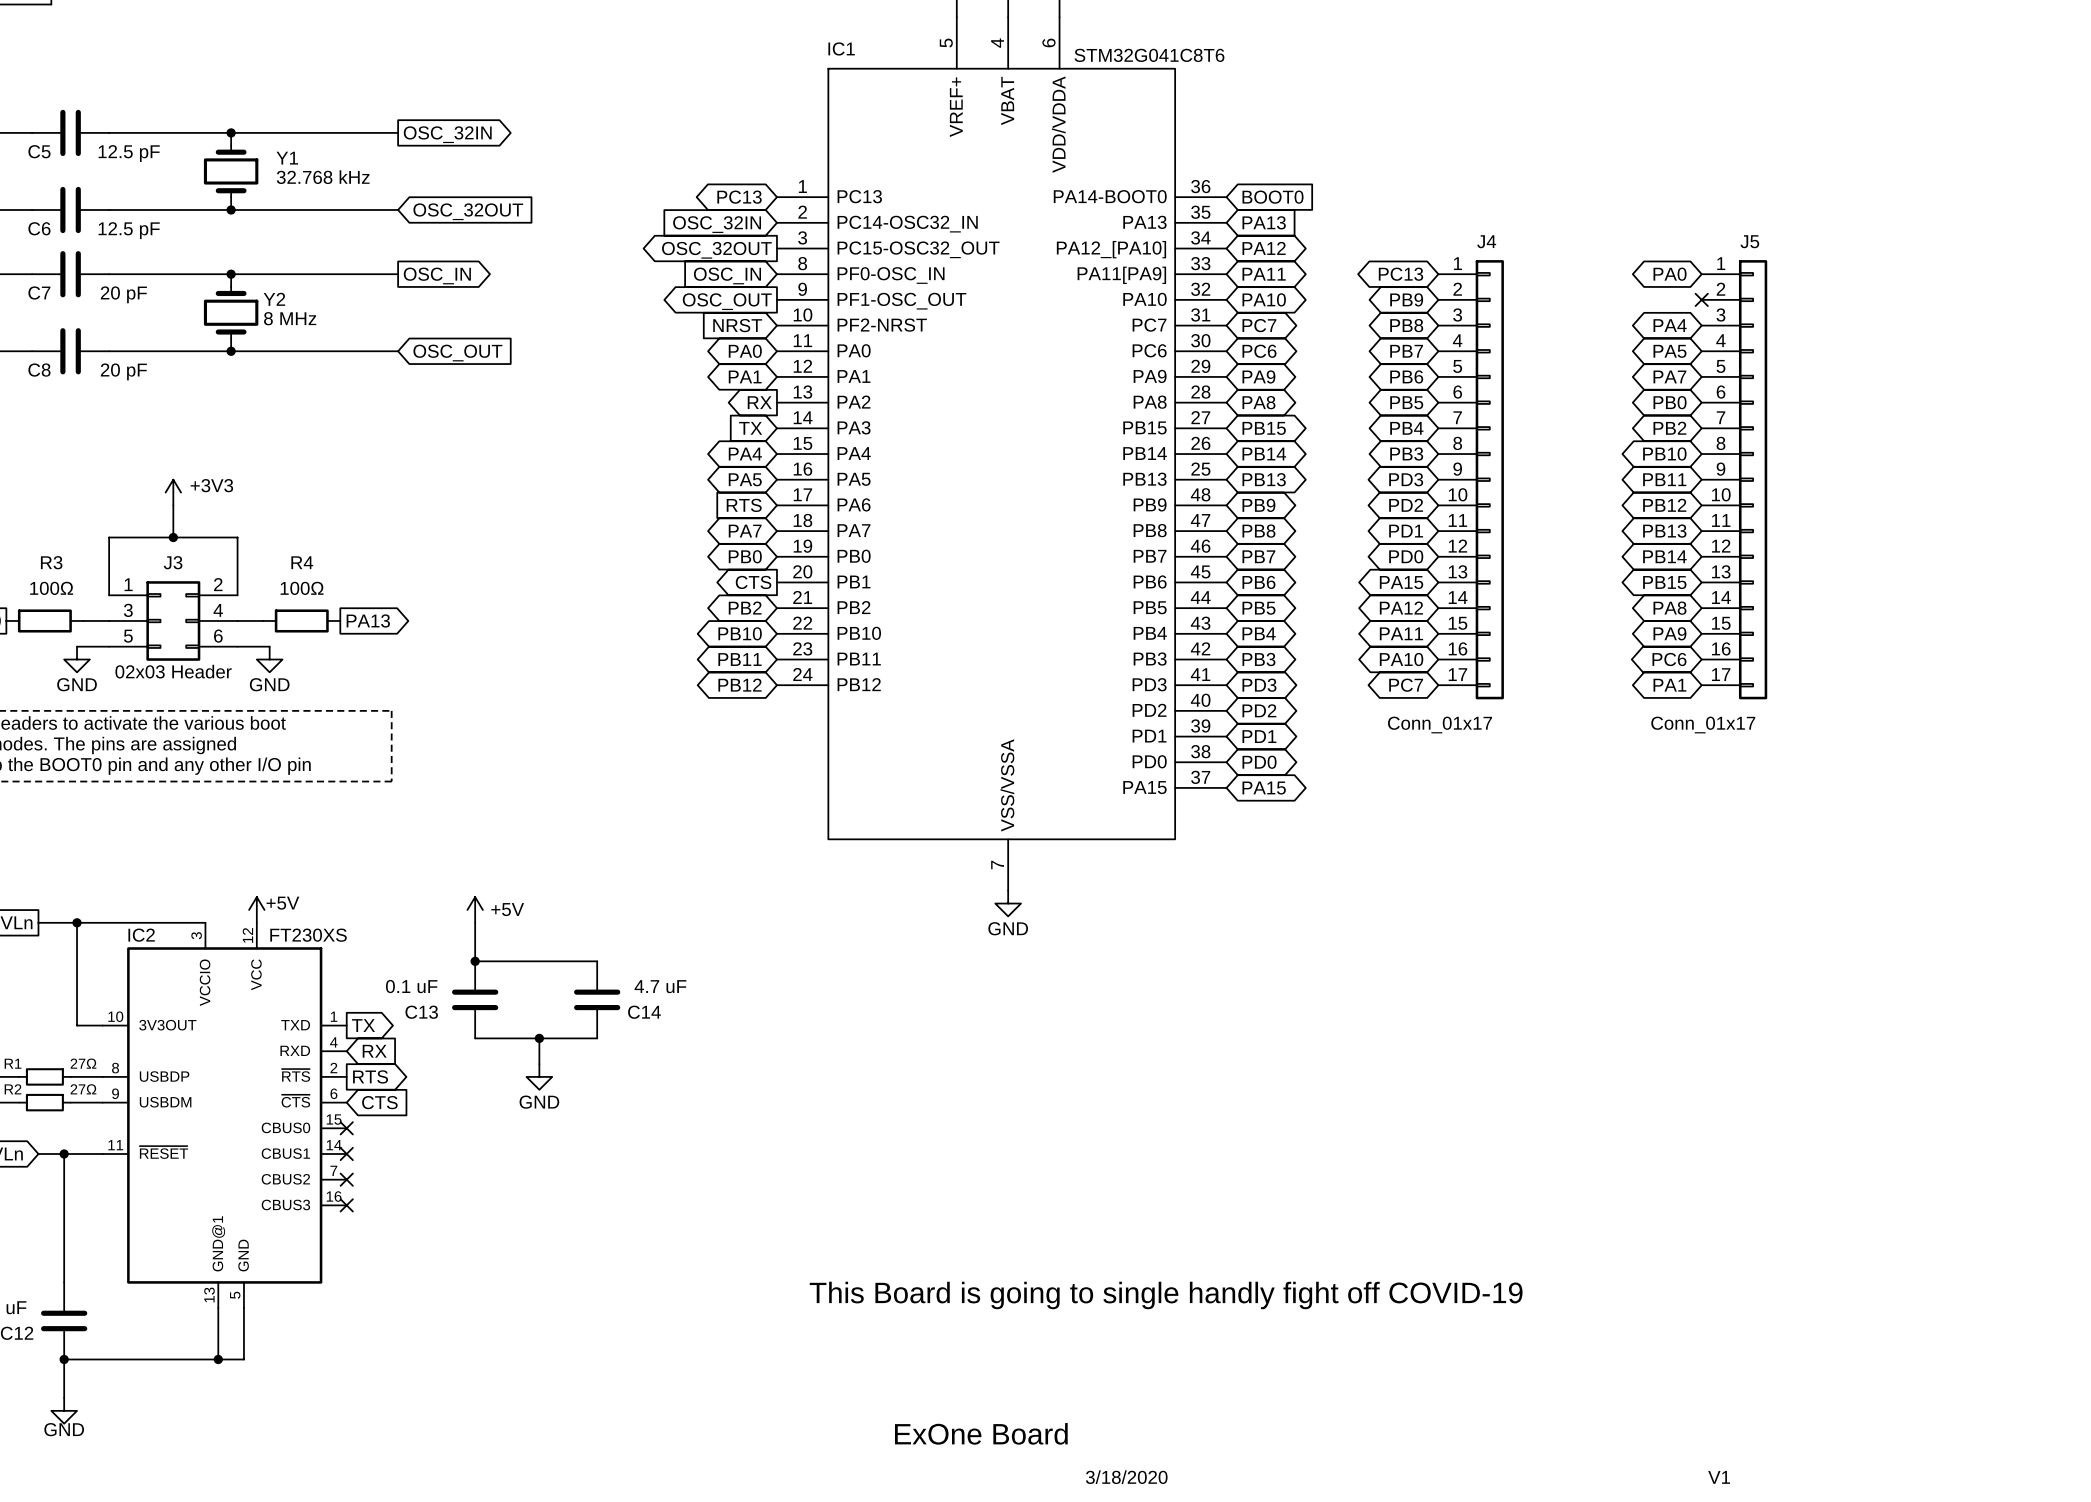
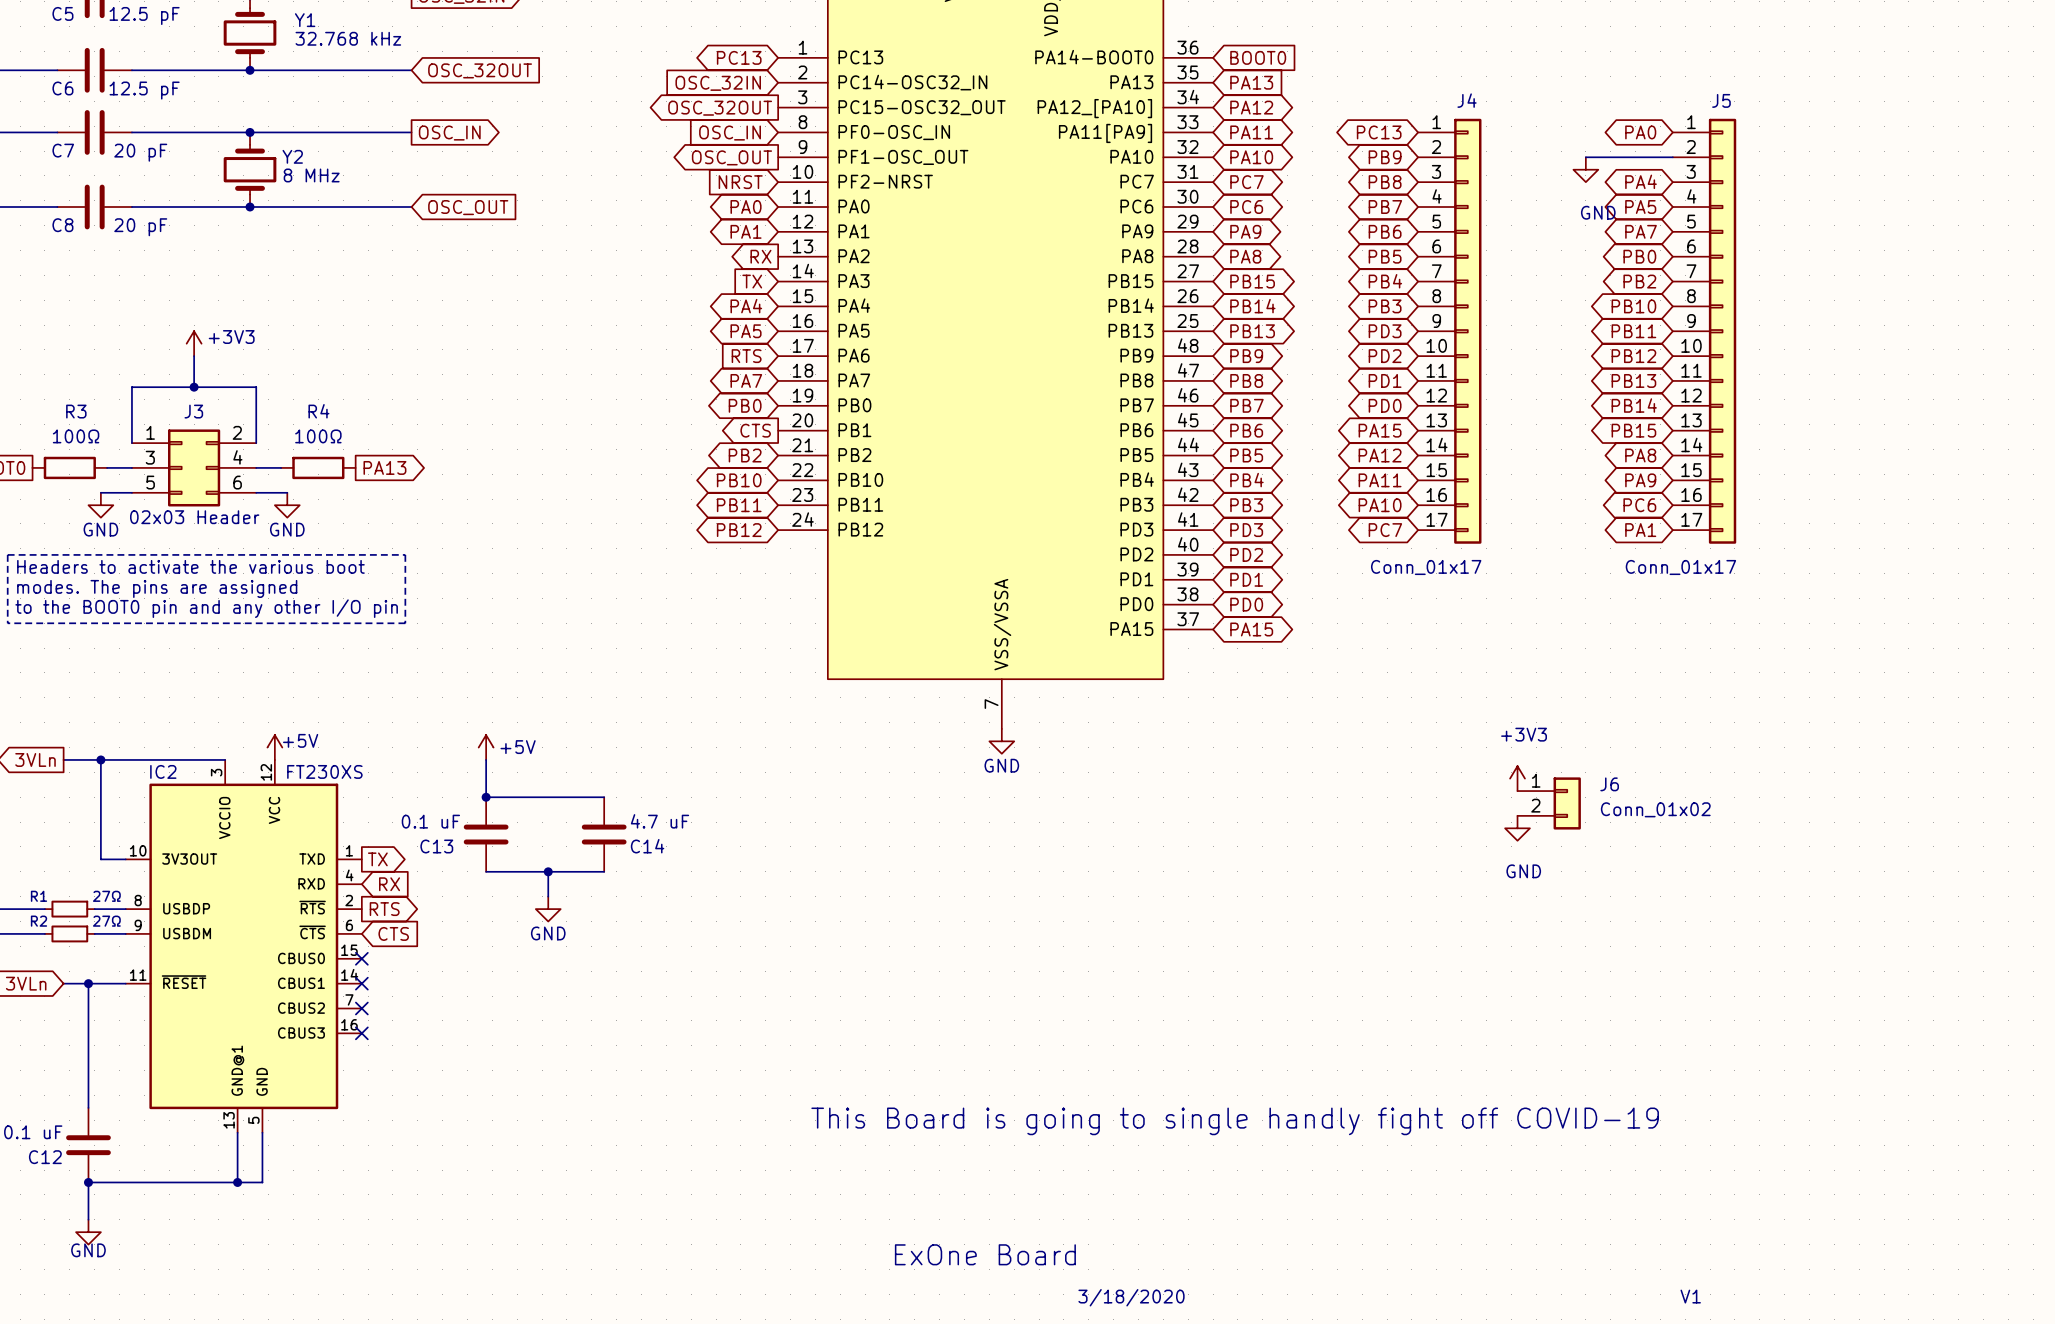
wire: none -> (1585, 157) (1672, 157)
no-connect mark: (1701, 299) -> none
power symbol: none -> GND (1585, 169)
power symbol: none -> +3V3 (1517, 778)
J6: none -> Conn_01x02 (1549, 803)
power symbol: none -> GND (1517, 828)

